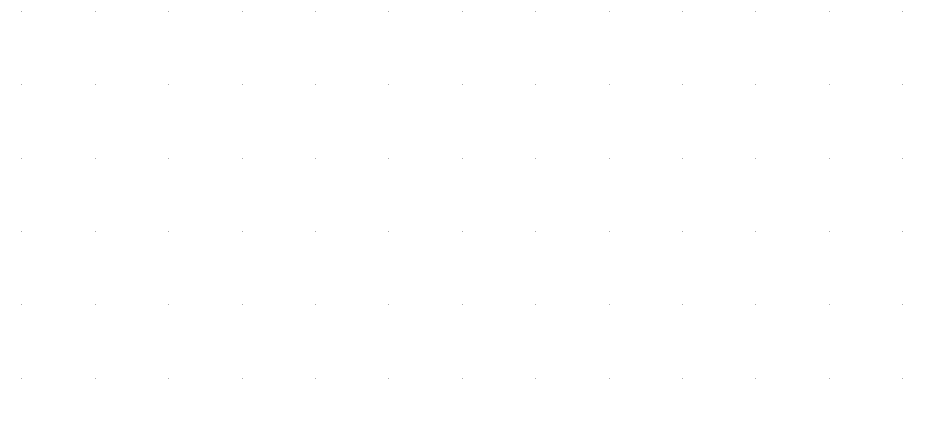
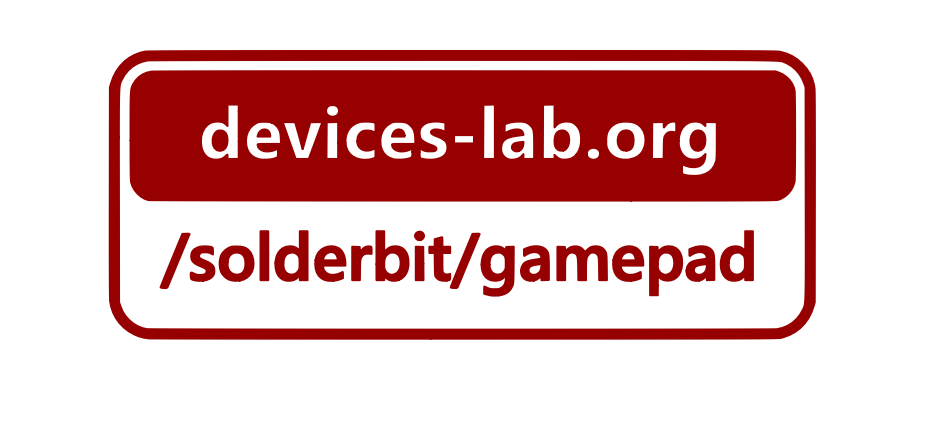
power symbol: none -> (462, 194)

